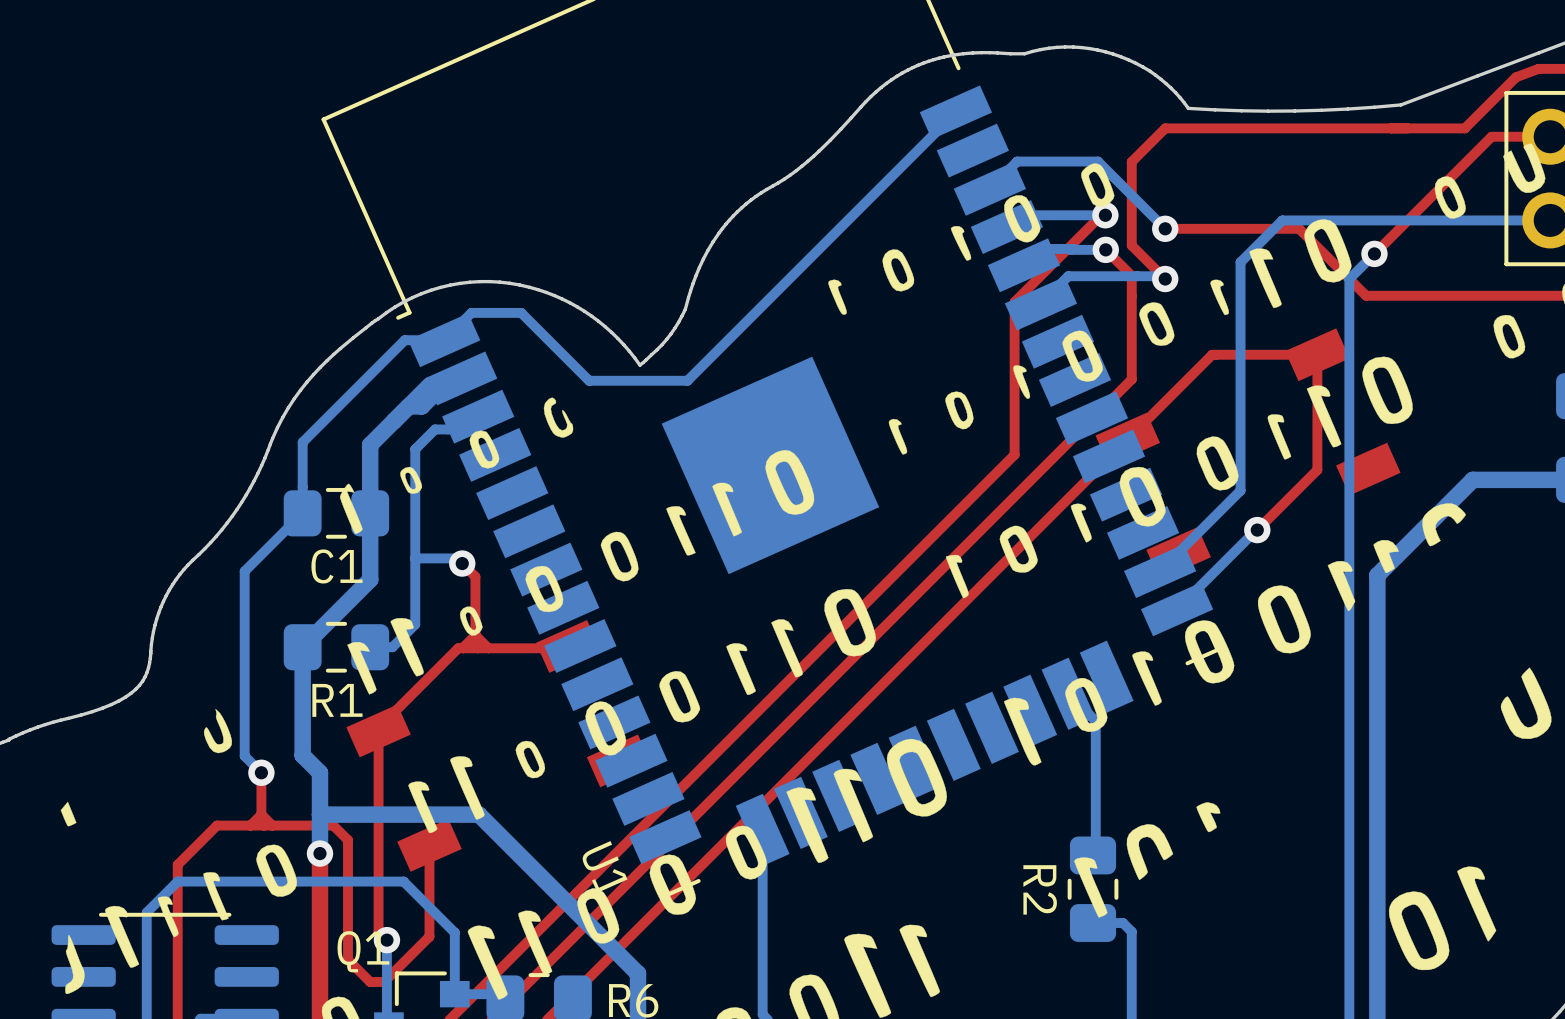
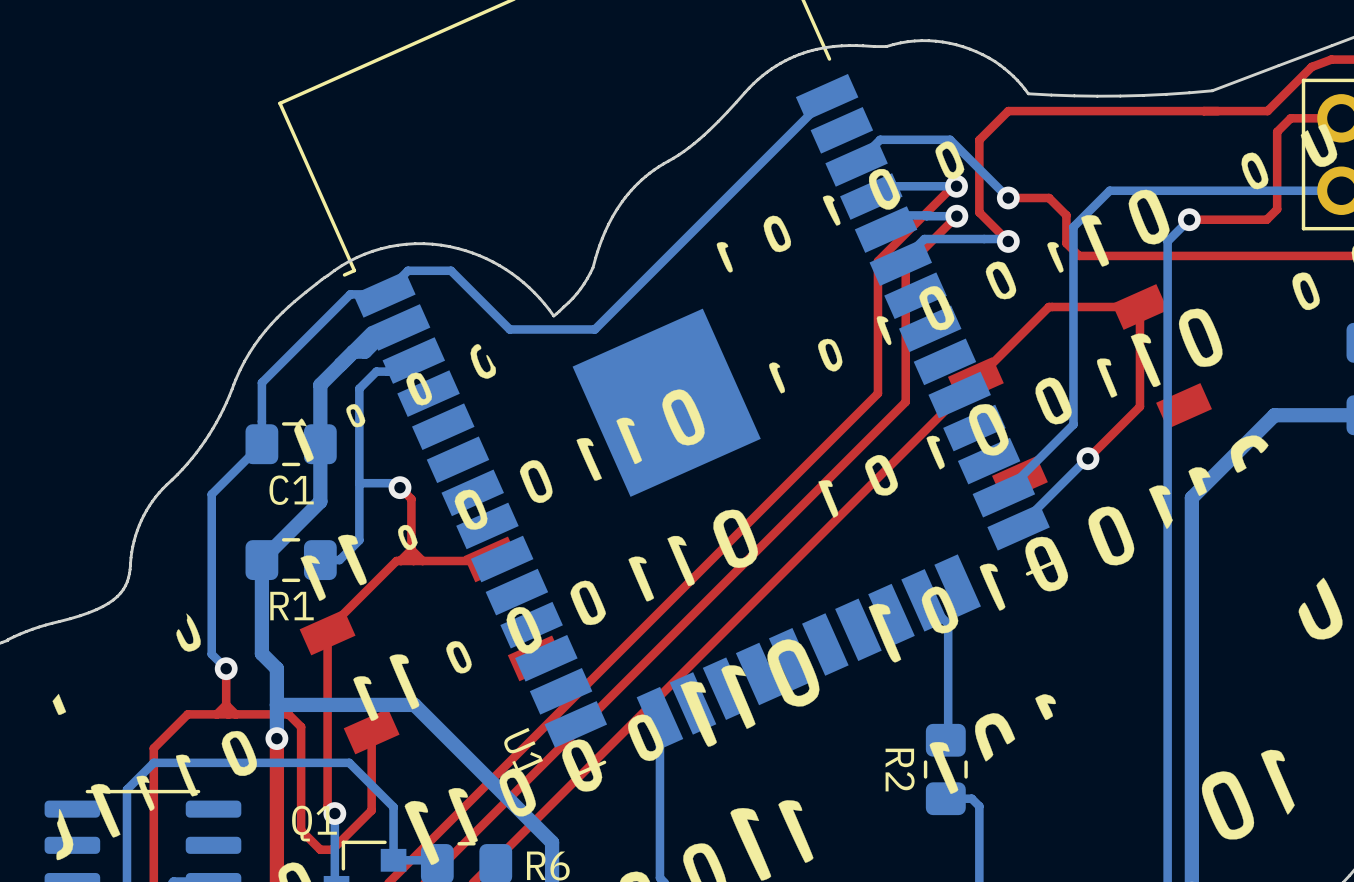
top track: (1475, 152) (1374, 253) -> (1277, 131) (1277, 209) (1266, 219) (1189, 219)
top track: (1212, 228) (1299, 228) (1366, 295) -> (1049, 197) (1066, 215) (1066, 243) (1079, 255) (1182, 255)
top track: (1105, 249) (1131, 275) (1131, 379) (1046, 464) -> (956, 216) (905, 267) (905, 401)

